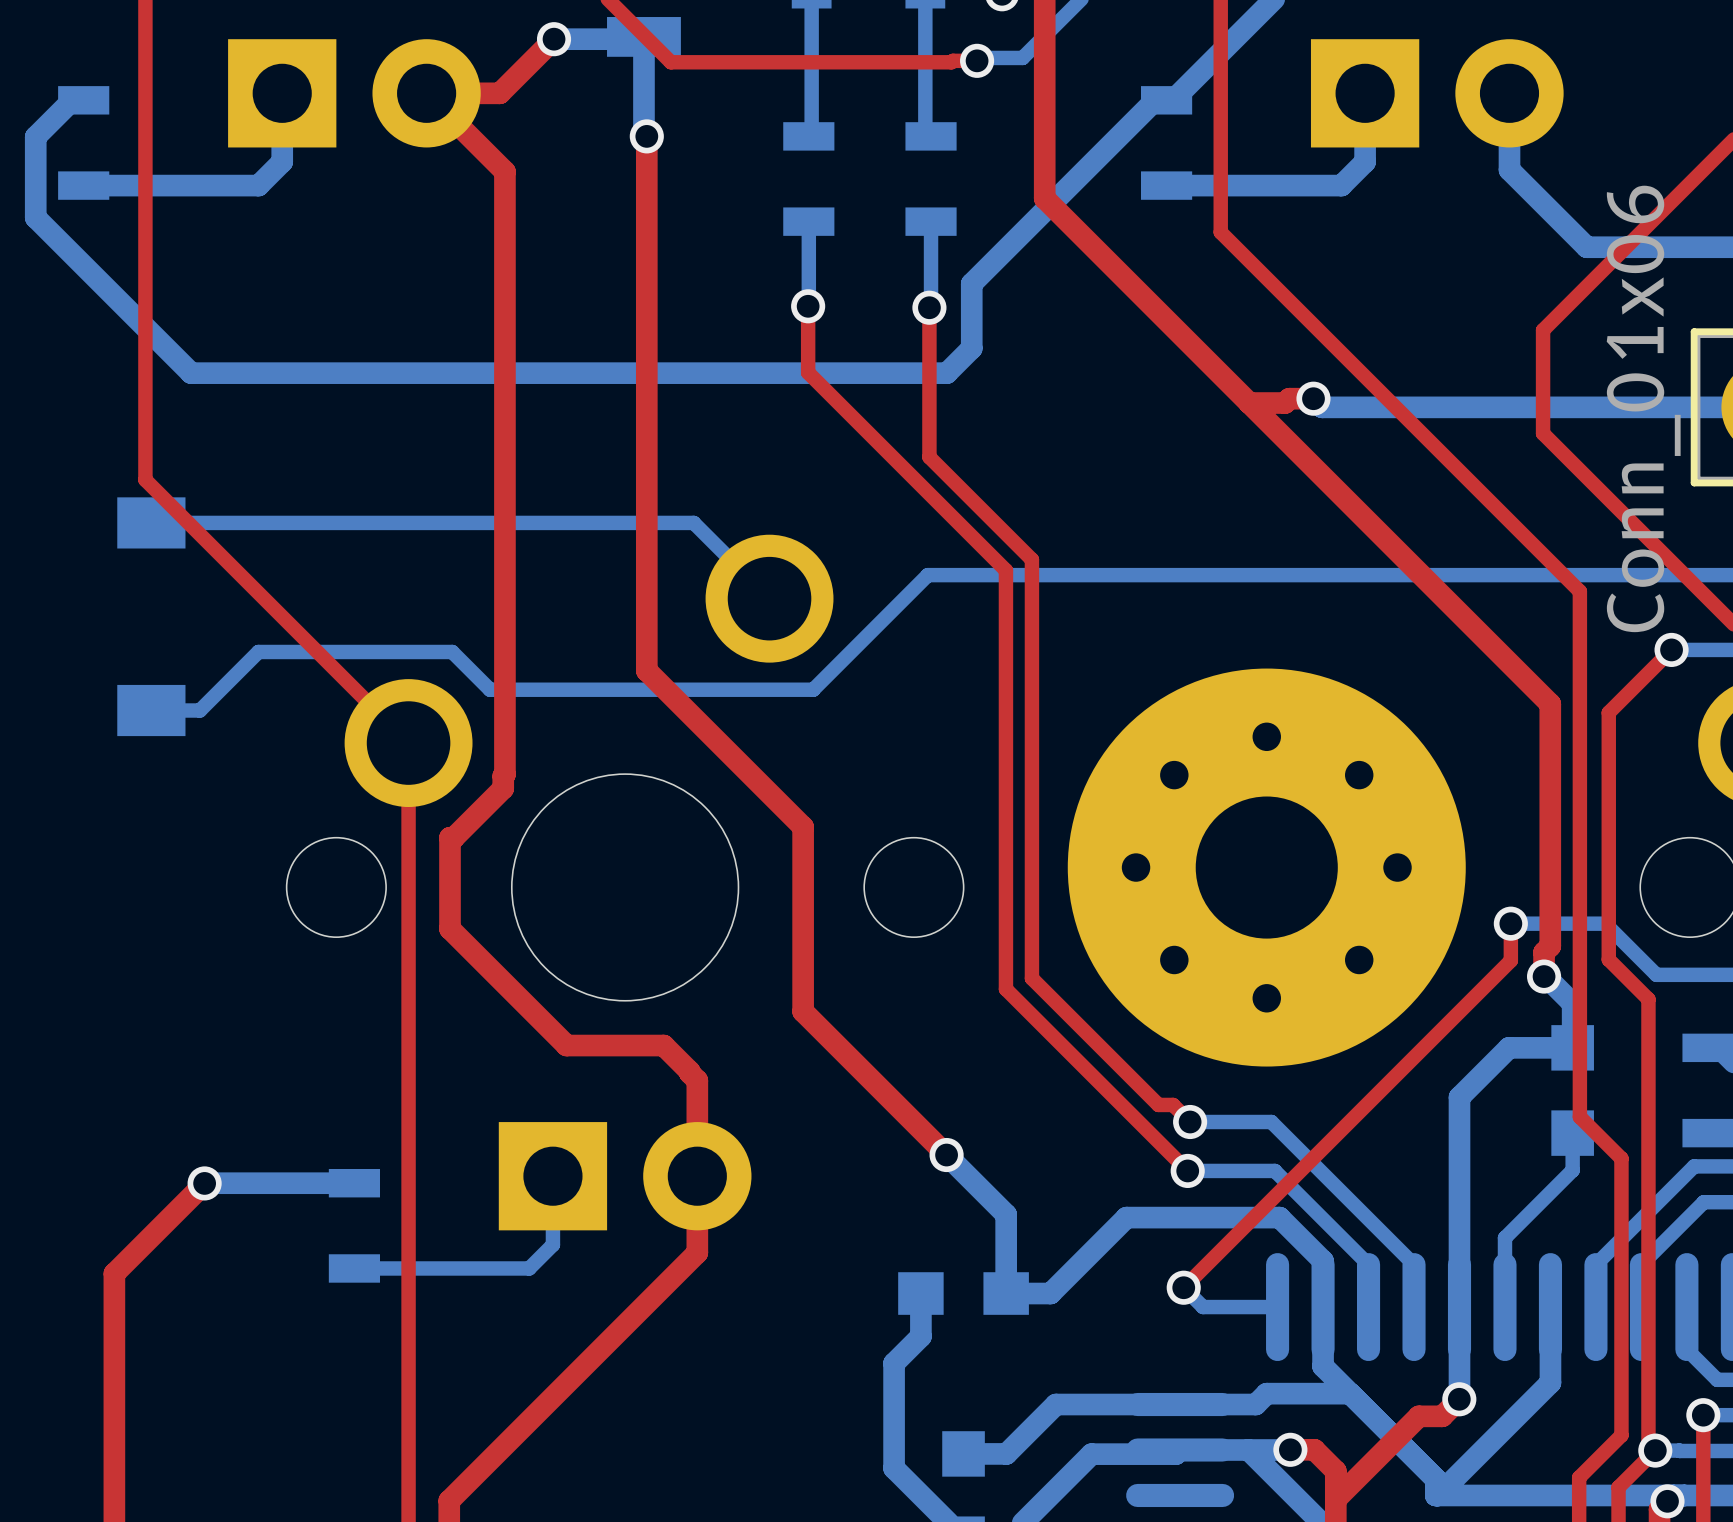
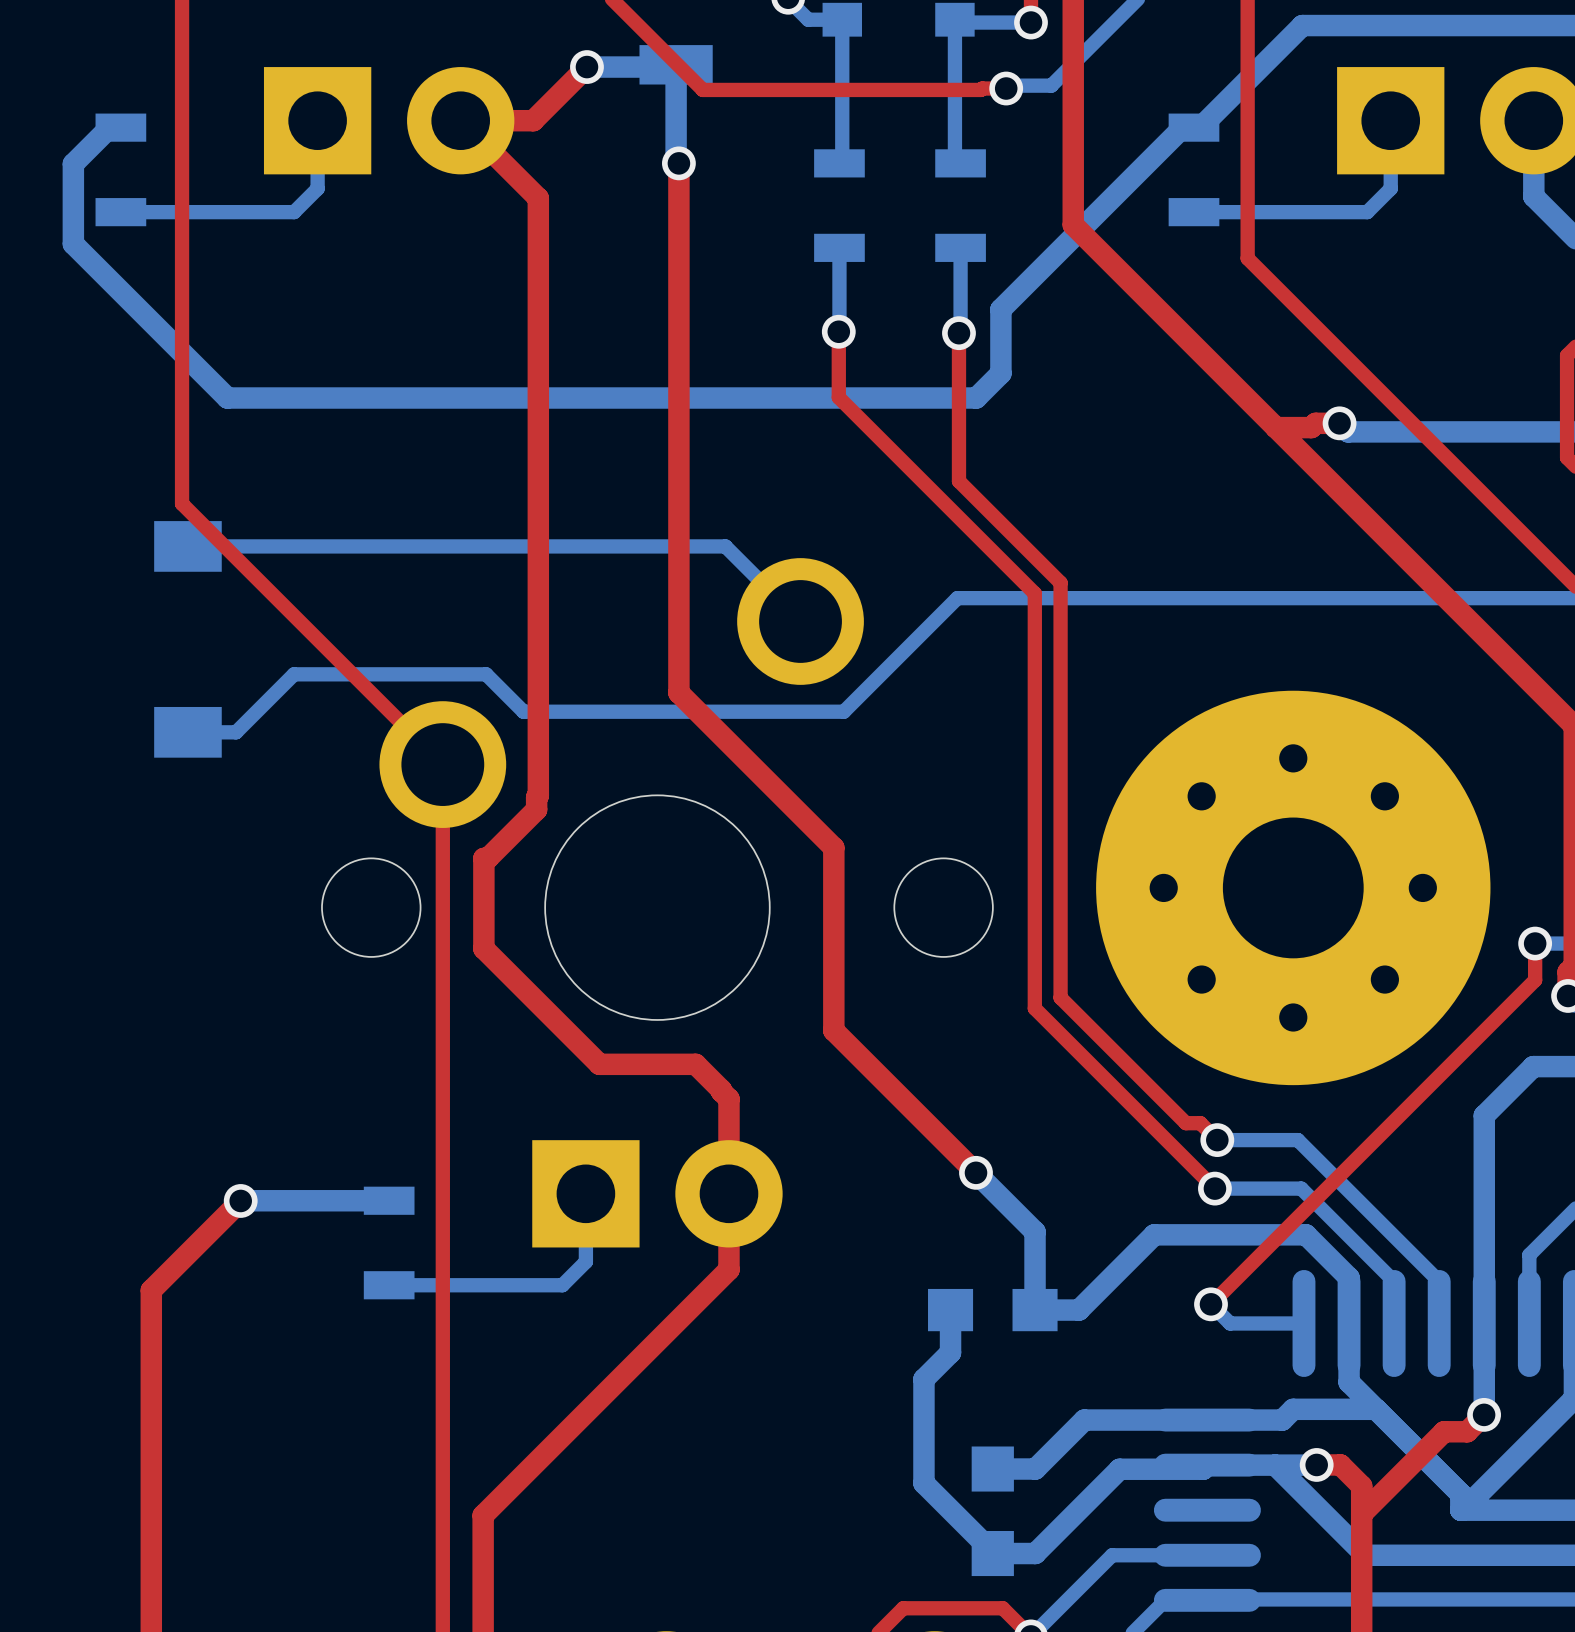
bottom track width: thick (282, 93) (282, 161) (258, 185) (83, 185) -> thin (317, 120) (317, 188) (294, 212) (120, 212)
bottom track width: thick (1365, 93) (1365, 161) (1341, 185) (1166, 185) -> thin (1390, 120) (1390, 188) (1367, 212) (1193, 212)

